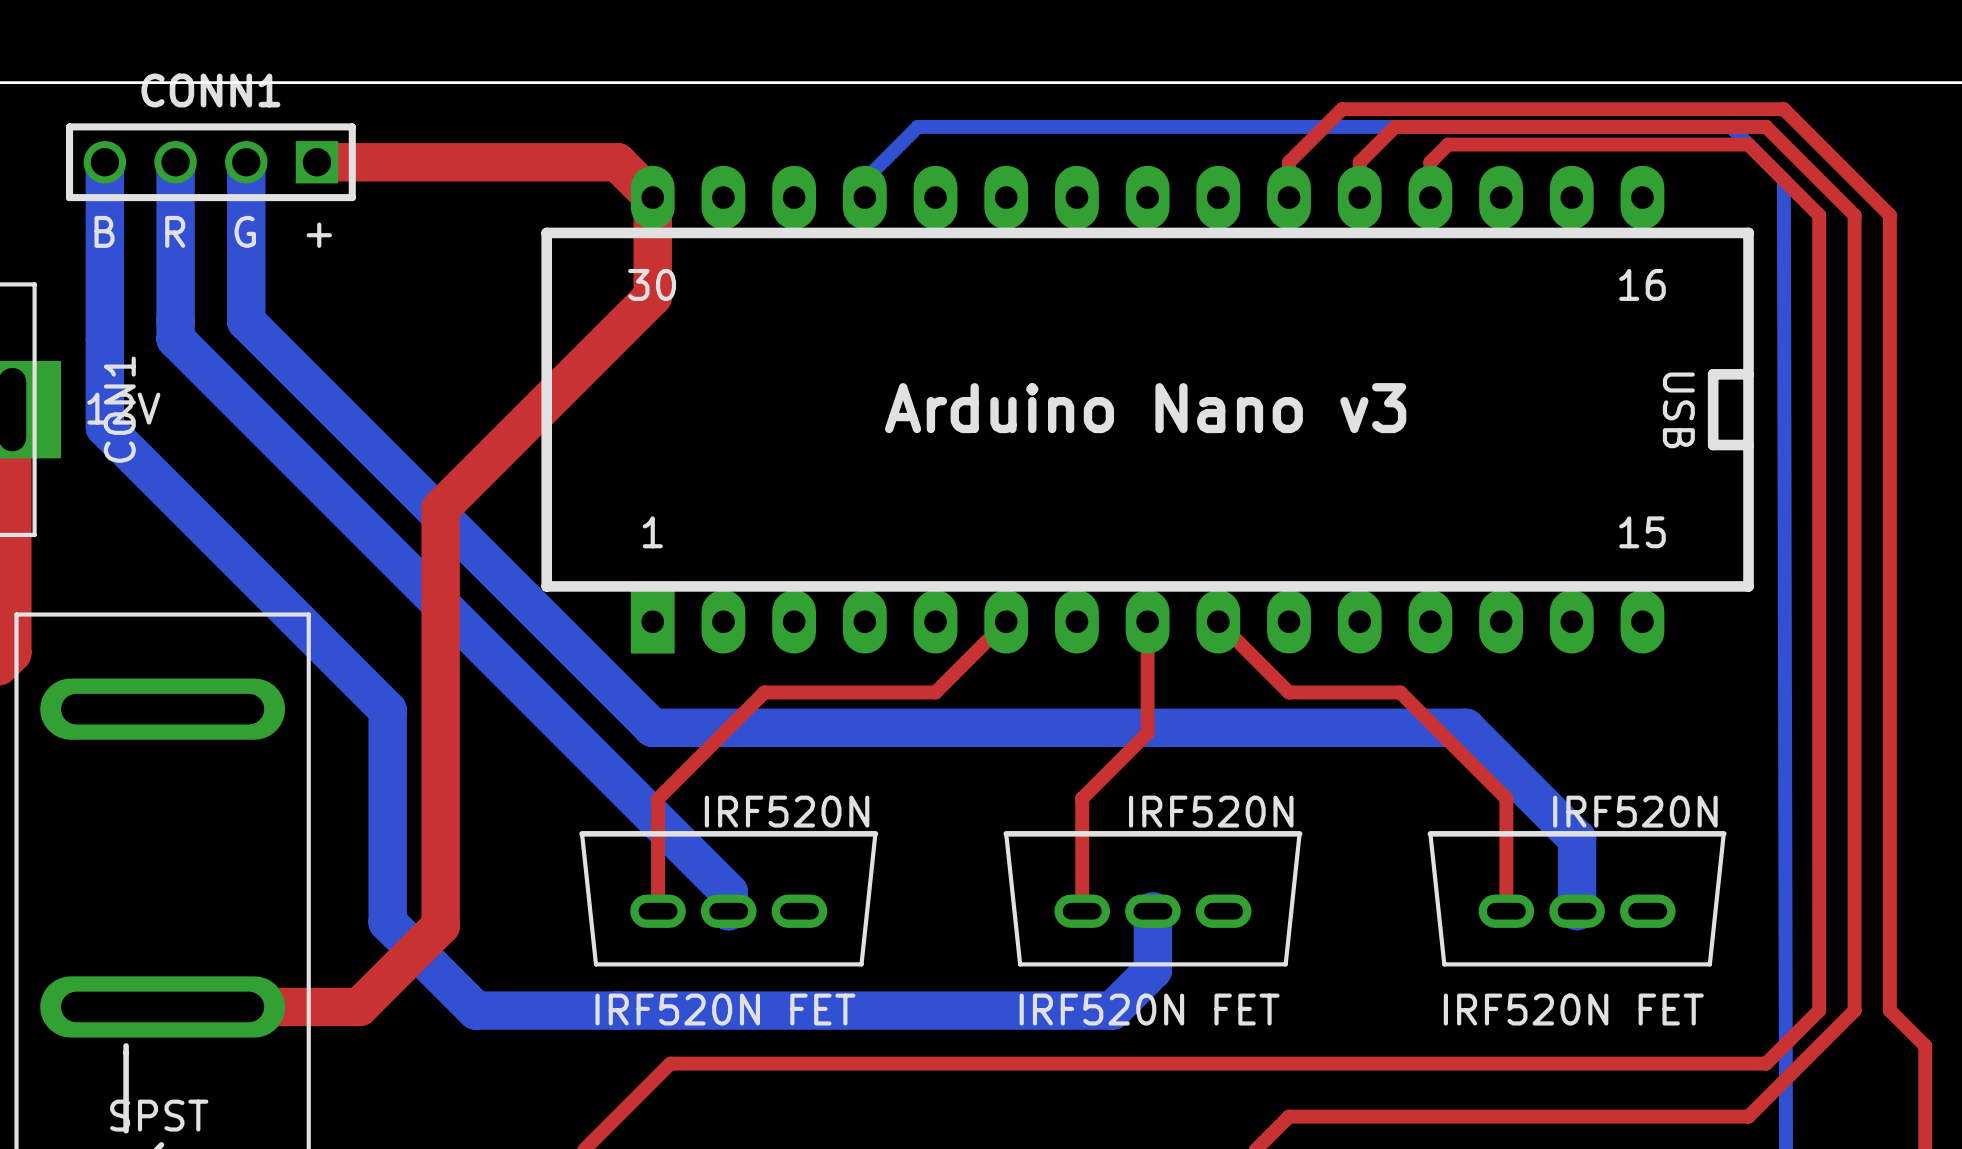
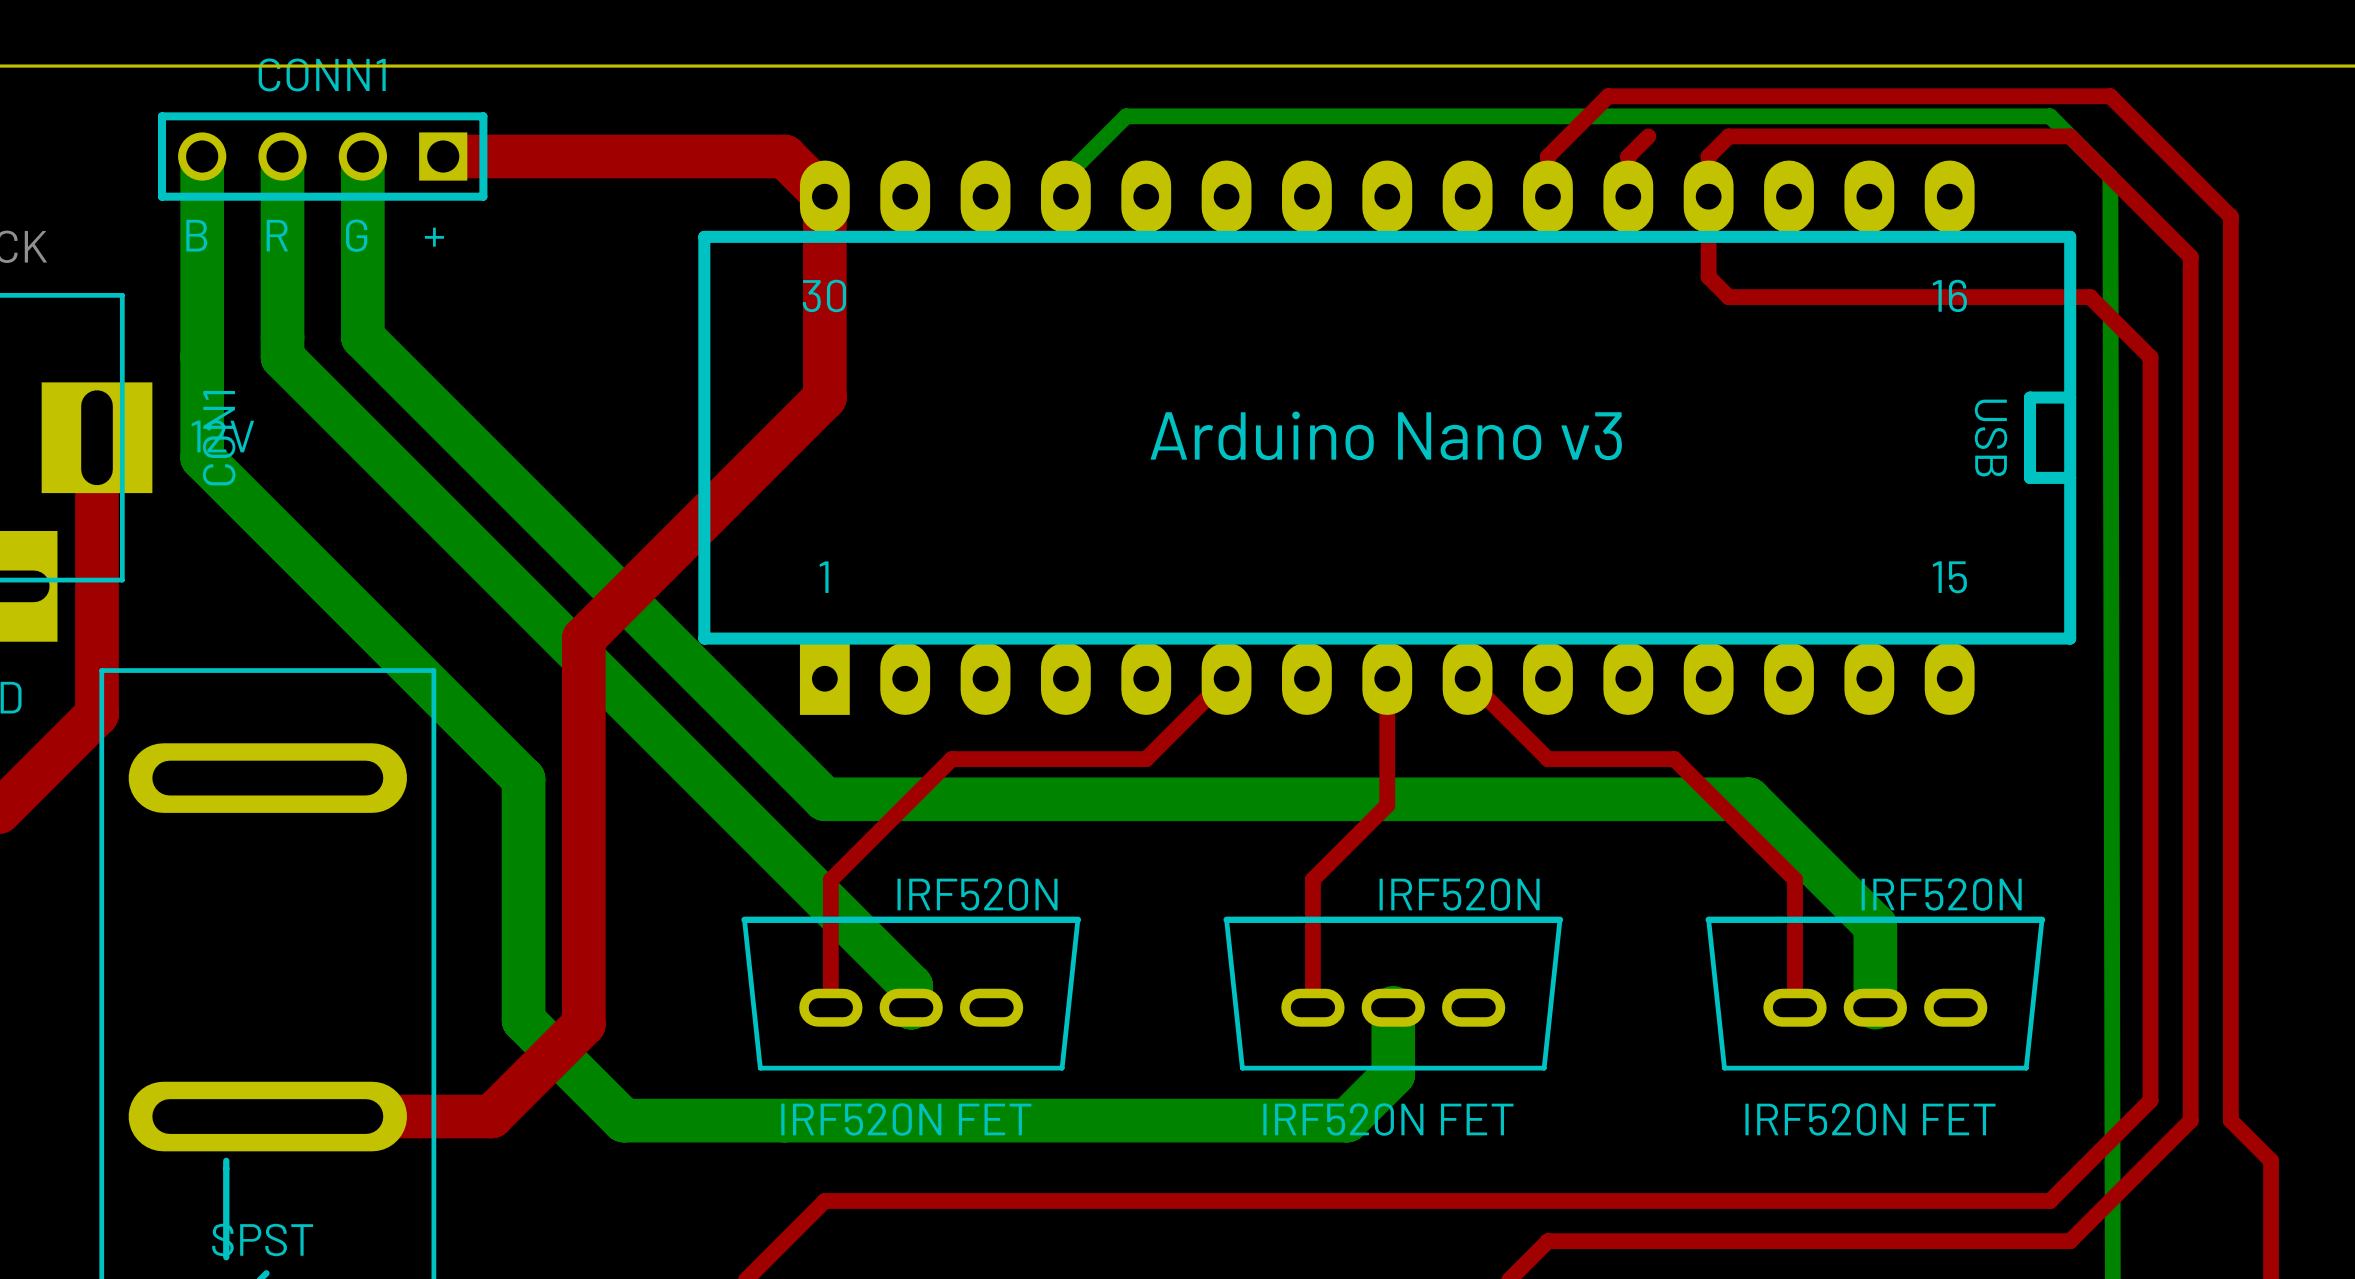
top track: (1377, 144) (1395, 126) (1766, 126) (1854, 215) (1854, 250) -> none
top track: none -> (1708, 196) (1708, 277) (1728, 297) (2090, 297) (2150, 357)
top track: (1819, 215) (1819, 338) -> (2150, 216) (2190, 256)
top track: (652, 296) (440, 508) (440, 586) -> (824, 309) (824, 397) (583, 638)
top track: (1819, 992) (1819, 1010) (1766, 1063) (670, 1063) (652, 1081) -> (2150, 1100) (2050, 1200) (824, 1200)

